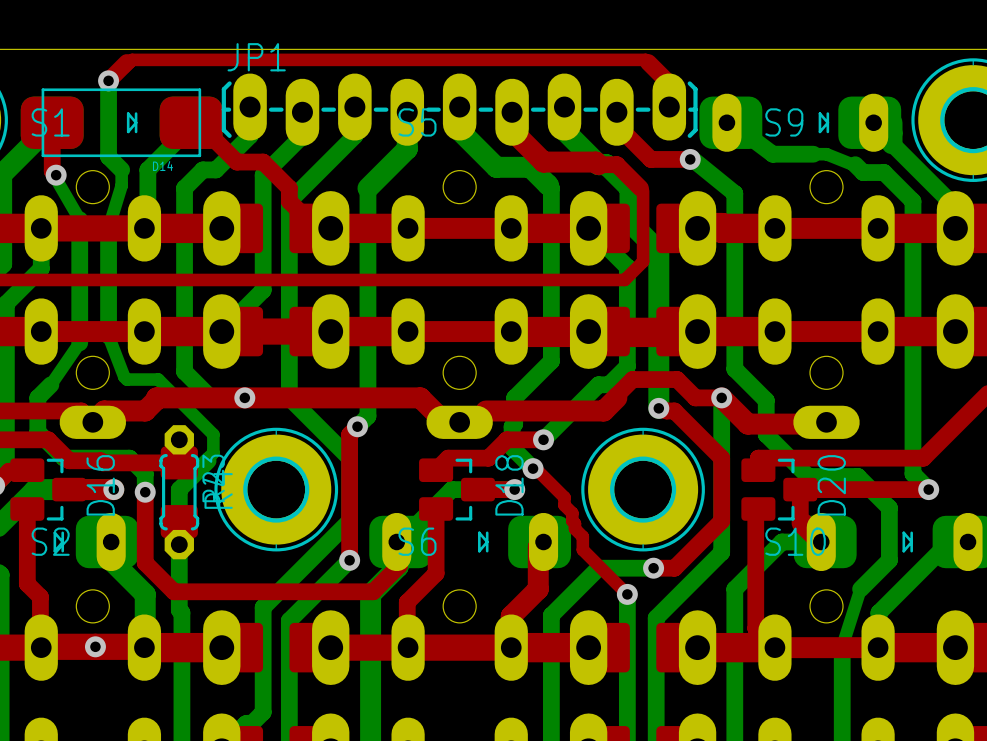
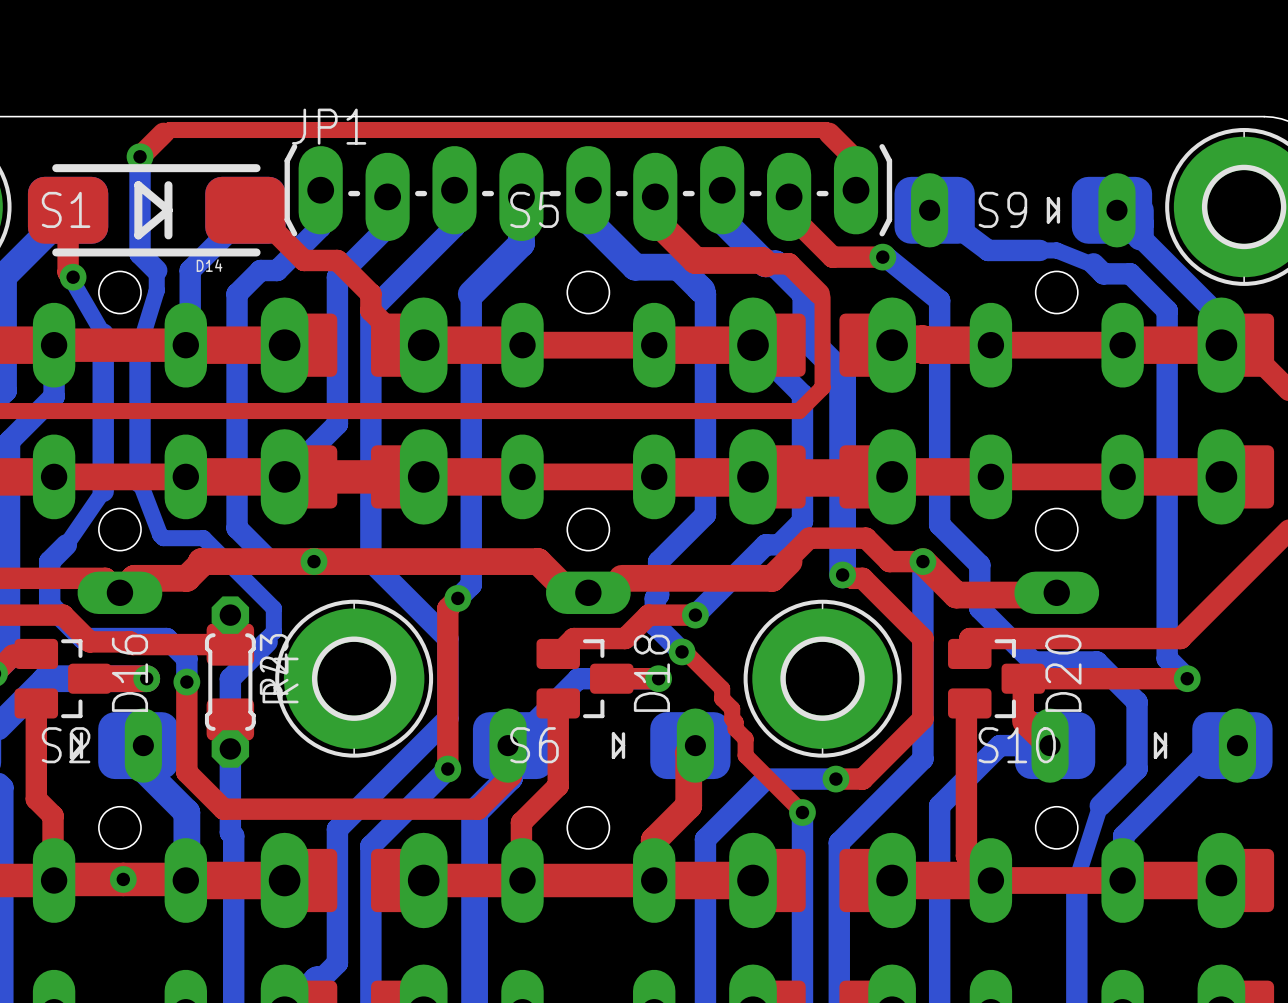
JP1 footprint: [221, 73, 698, 146] -> [284, 144, 893, 242]
D14 footprint: [20, 88, 223, 158] -> [27, 164, 286, 257]

